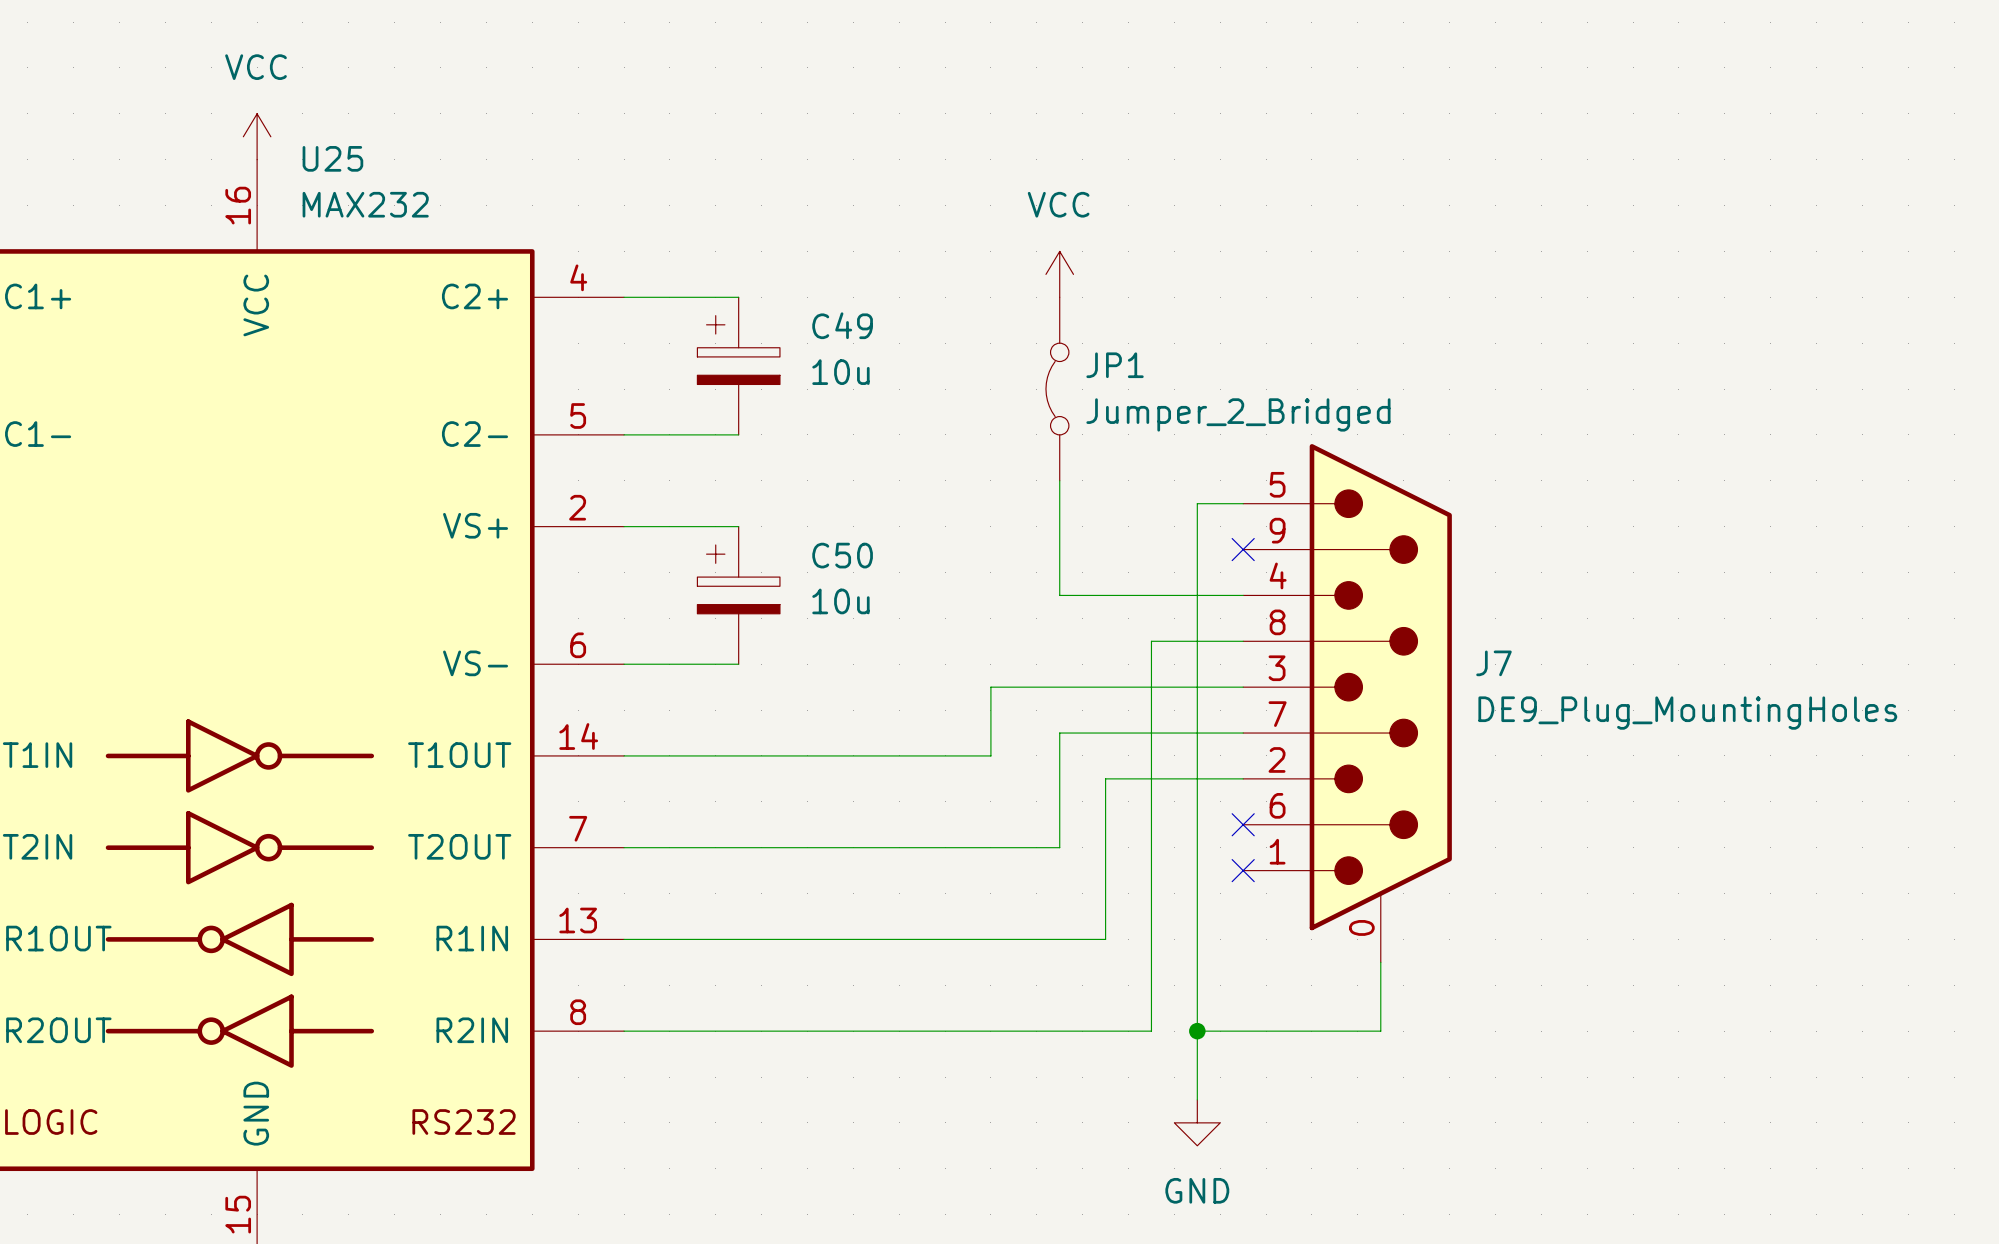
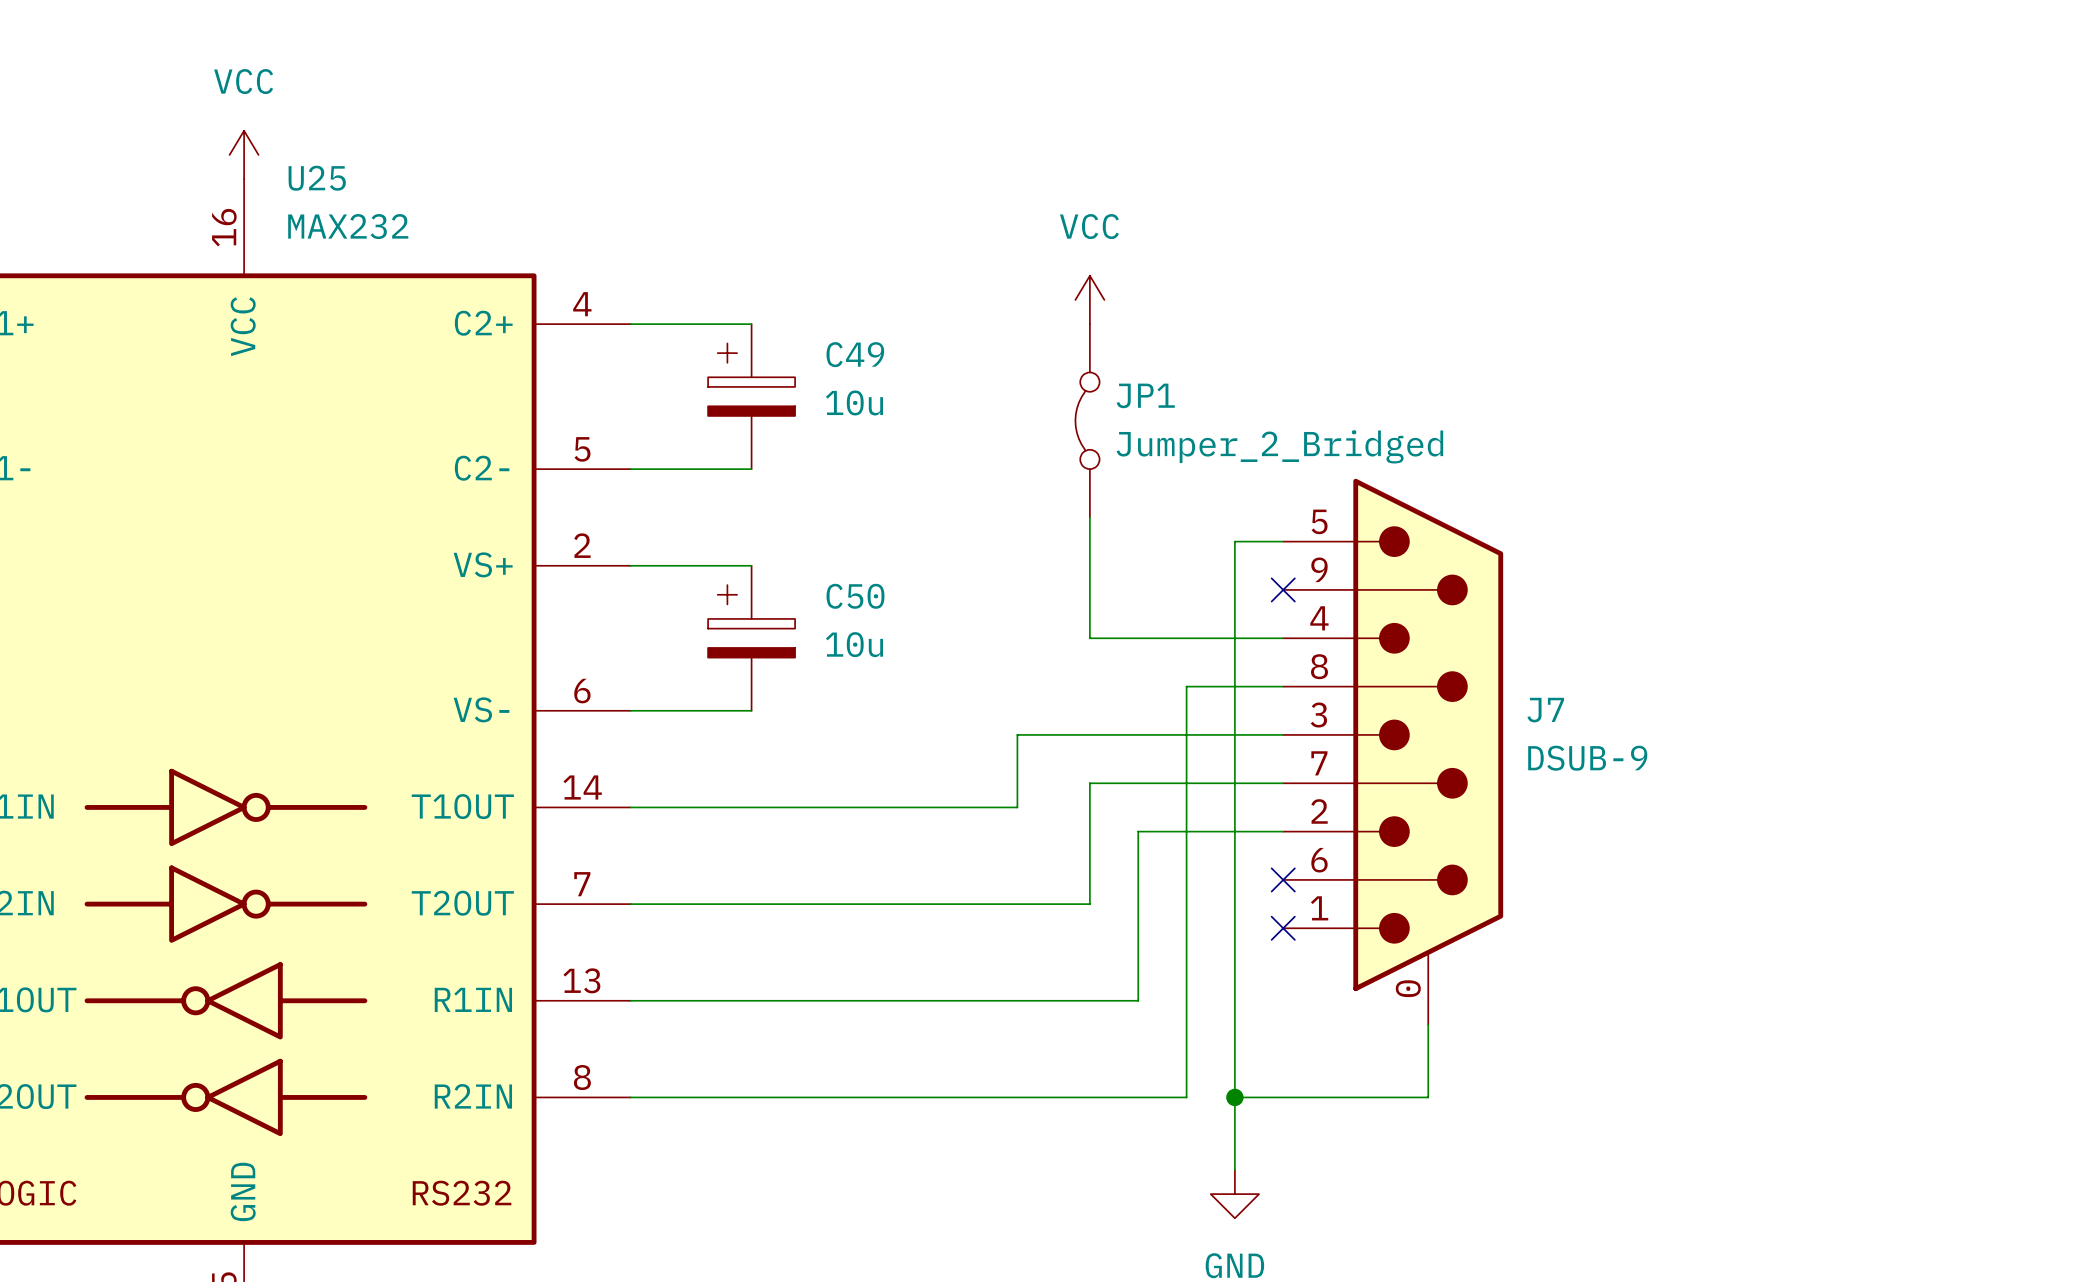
J7 value: DE9_Plug_MountingHoles (1687, 713) -> DSUB-9 (1587, 758)

